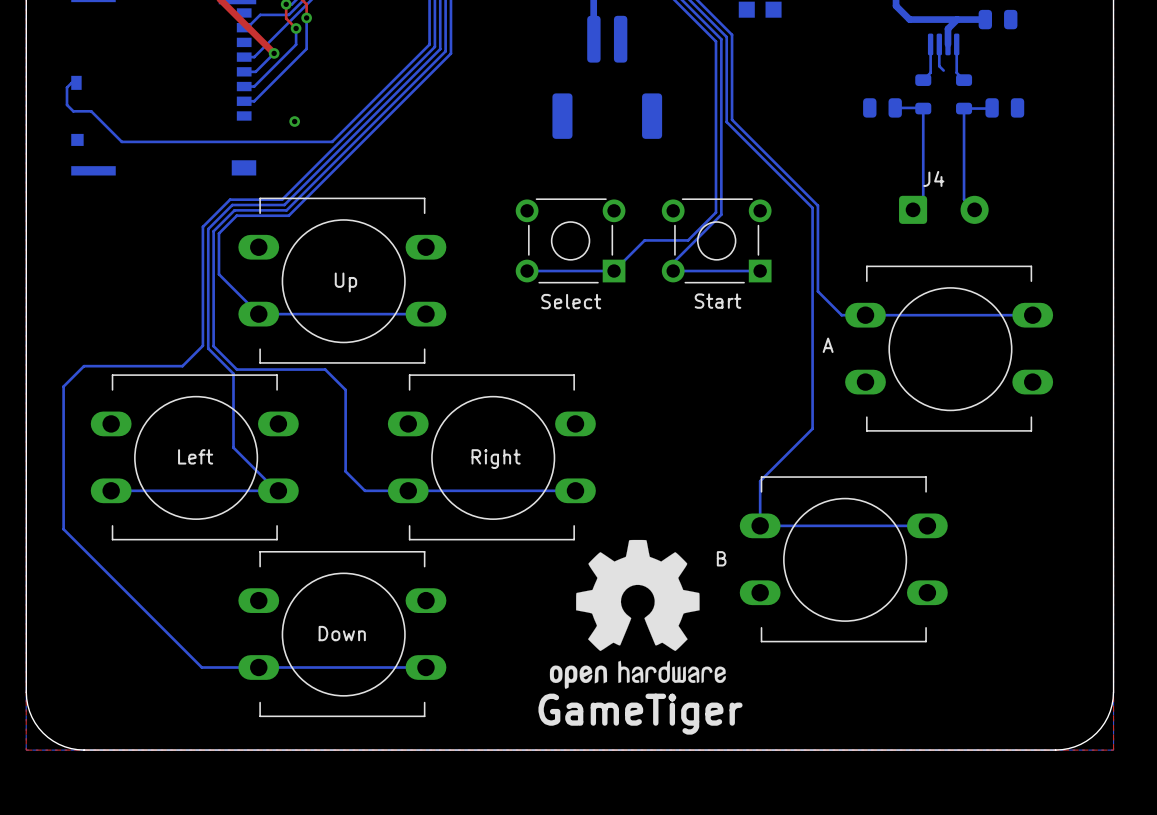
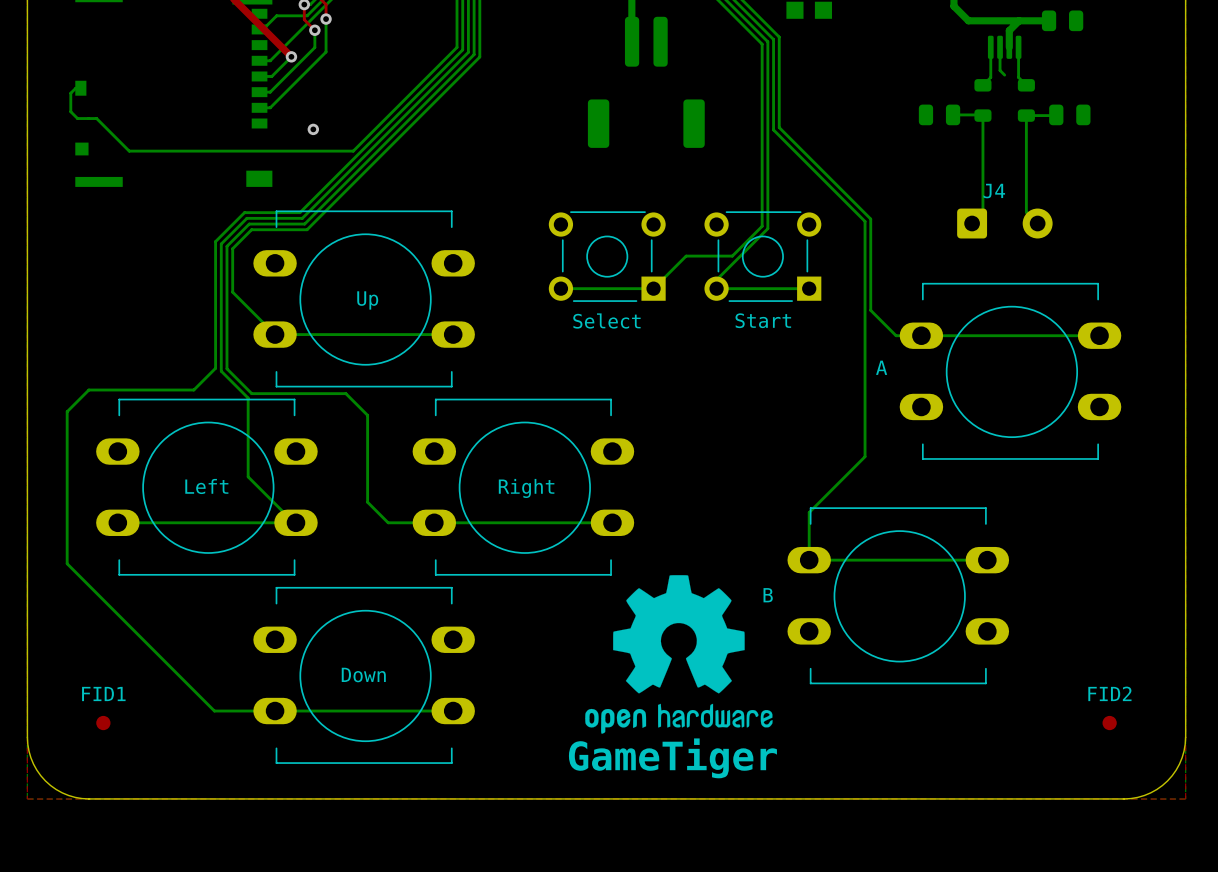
FID1: none -> (103, 723)
FID2: none -> (1109, 723)

